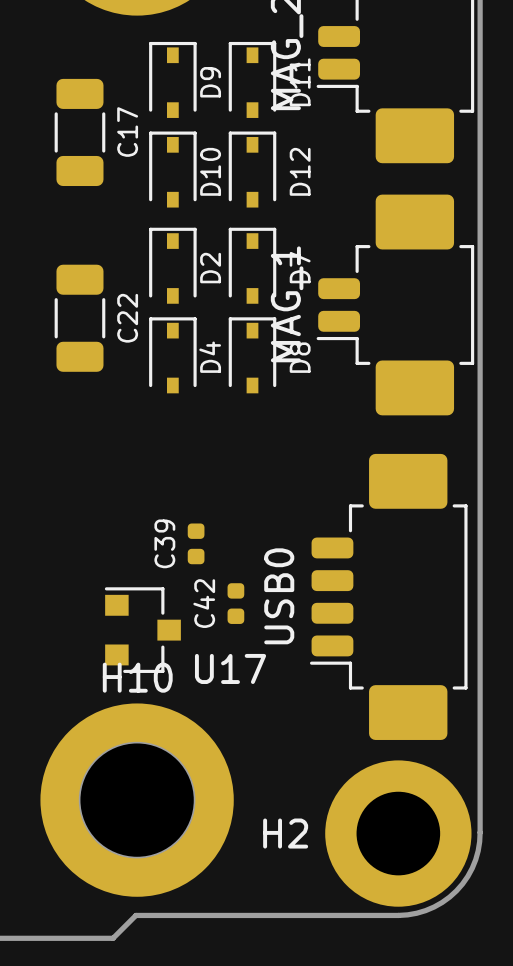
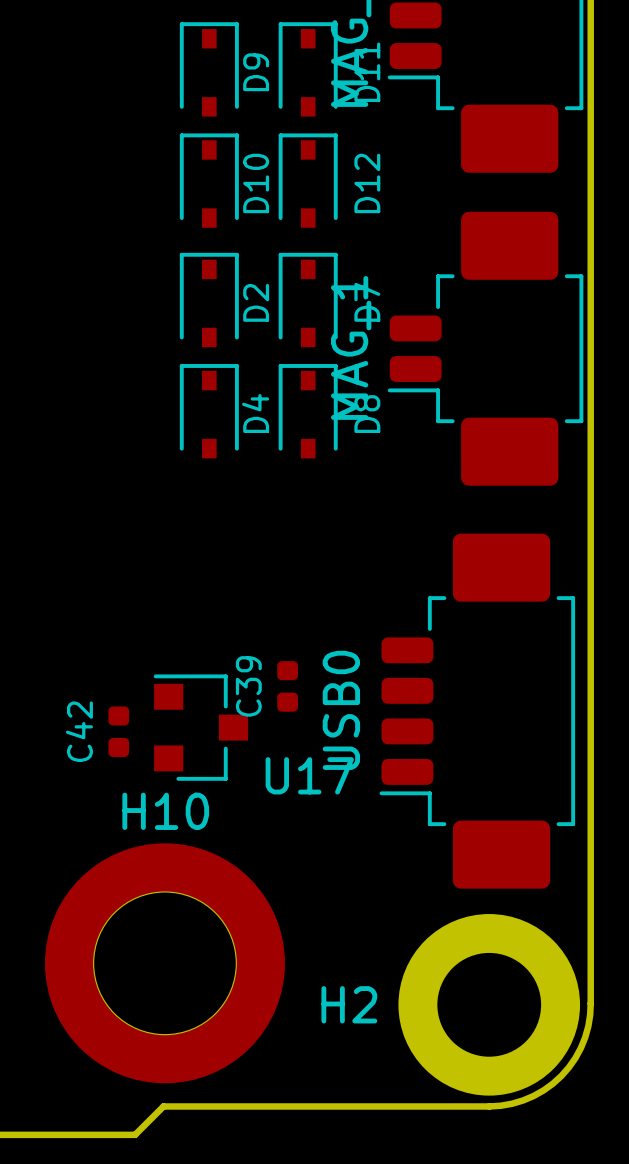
C17: (79, 132) -> none
C22: (79, 318) -> none
C39 position: (196, 543) -> (287, 686)
C42 position: (235, 603) -> (118, 731)
U17 position: (142, 630) -> (200, 727)

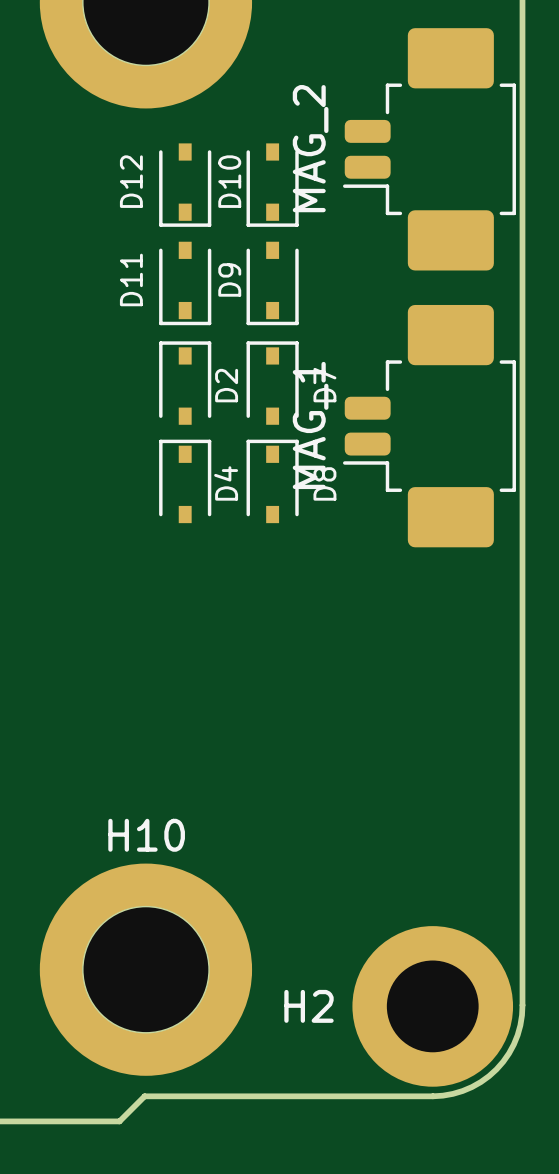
D9 rotation: 0° (209, 69) -> 180° (272, 283)
D9 position: (209, 69) -> (272, 283)
D11 rotation: 0° (308, 69) -> 180° (185, 283)
D11 position: (308, 69) -> (185, 283)
D10 rotation: 0° (209, 180) -> 180° (272, 185)
D10 position: (209, 180) -> (272, 185)
D12 rotation: 0° (308, 180) -> 180° (185, 185)
D12 position: (308, 180) -> (185, 185)
C39: (287, 686) -> none
USB0: (477, 711) -> none
U17: (200, 727) -> none
C42: (118, 731) -> none

